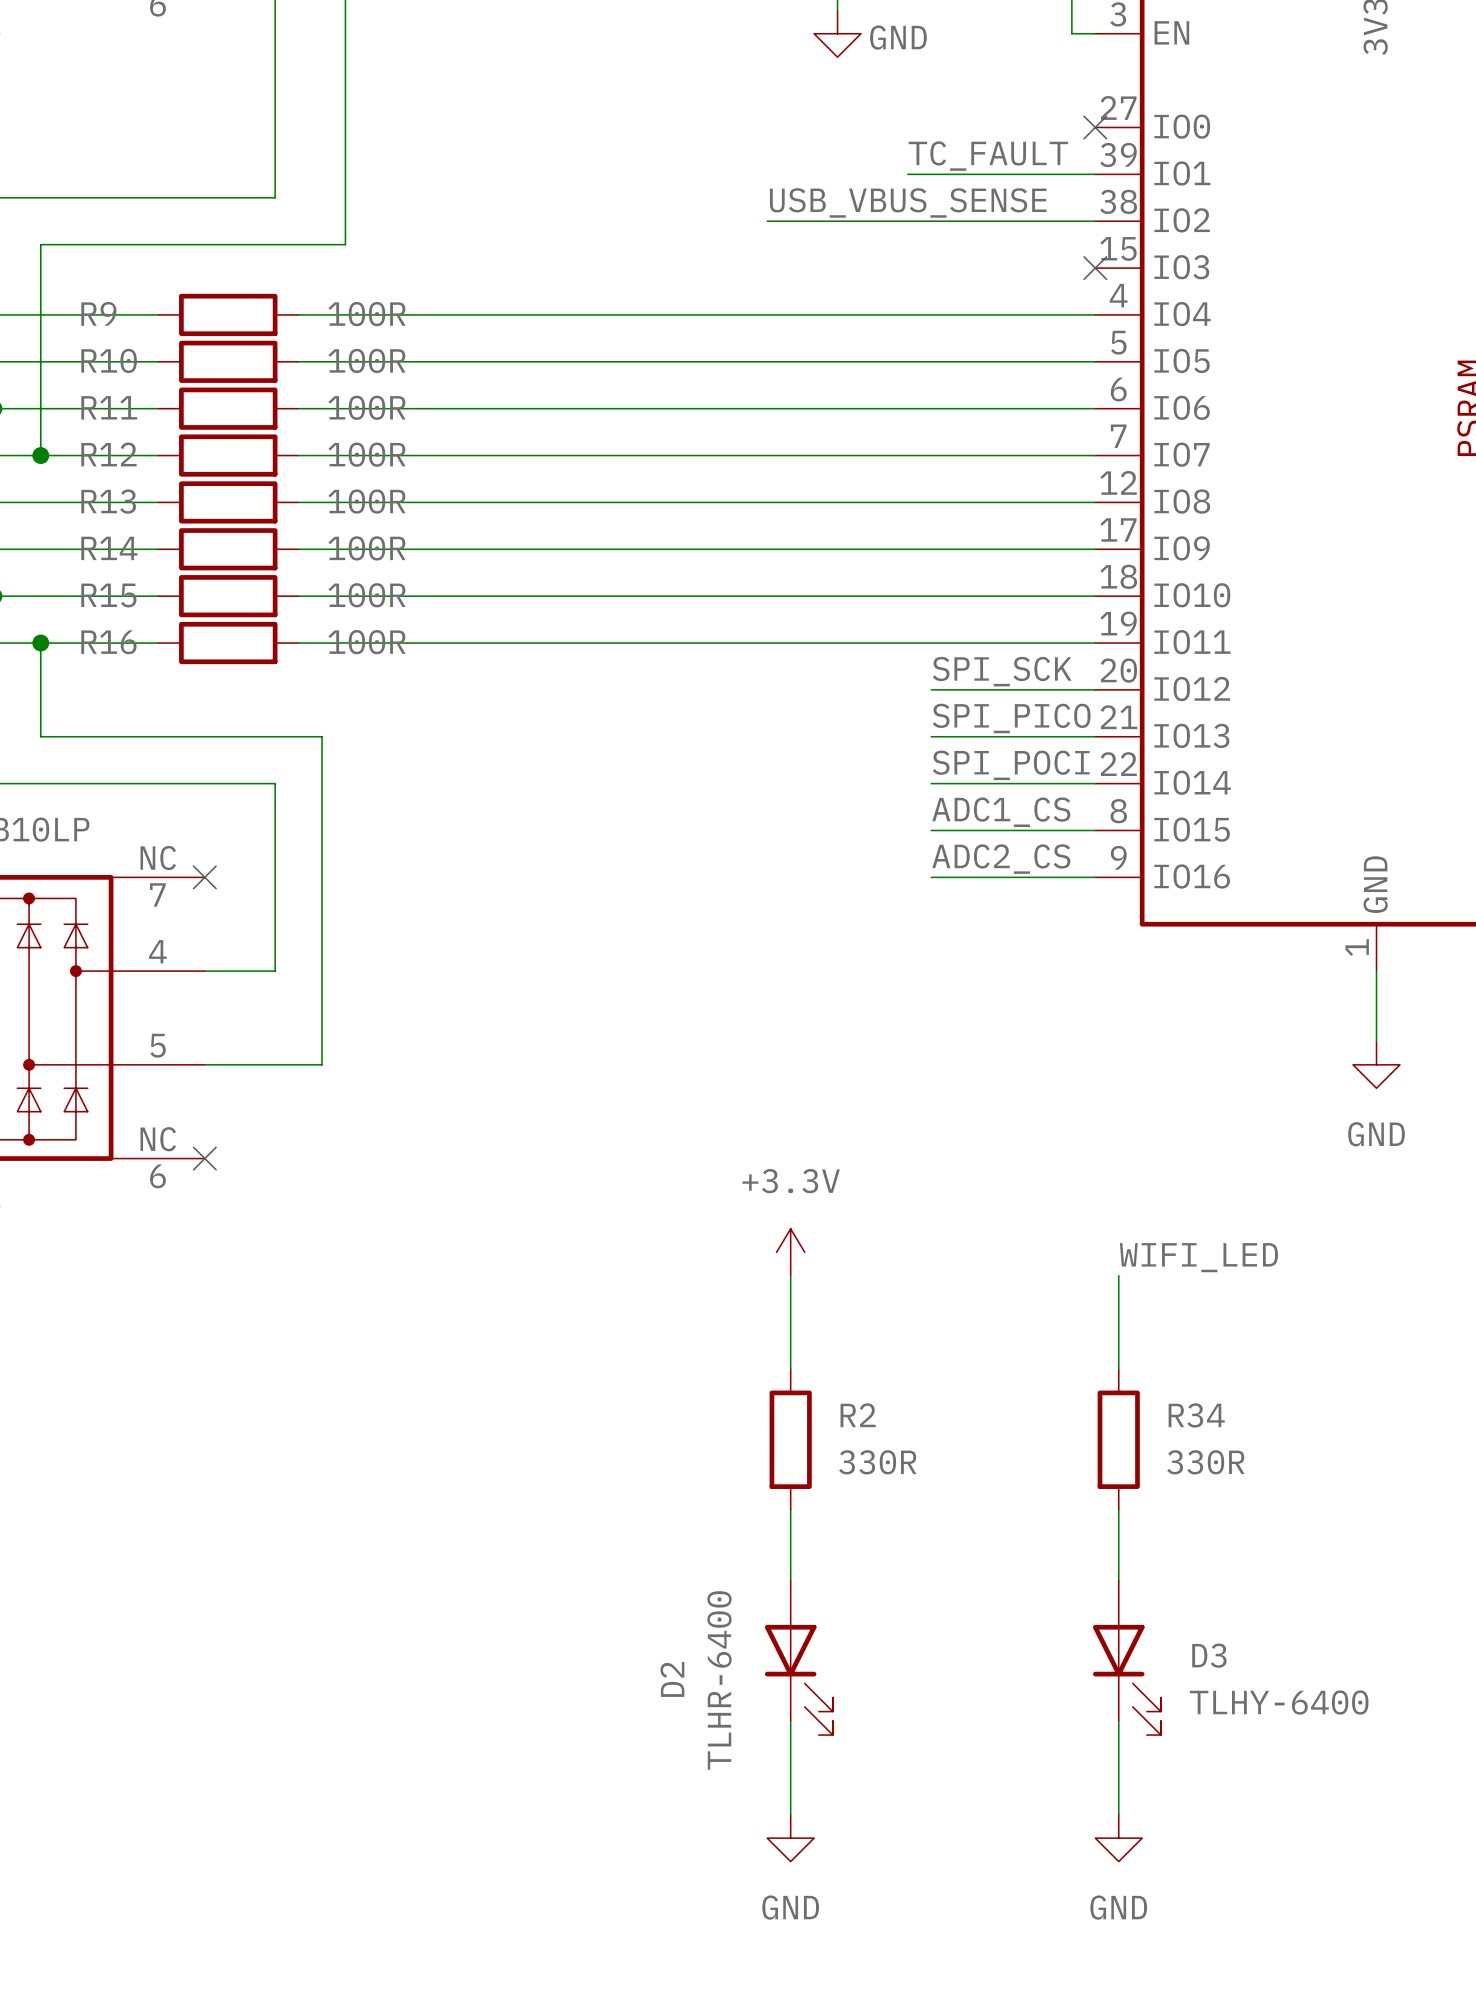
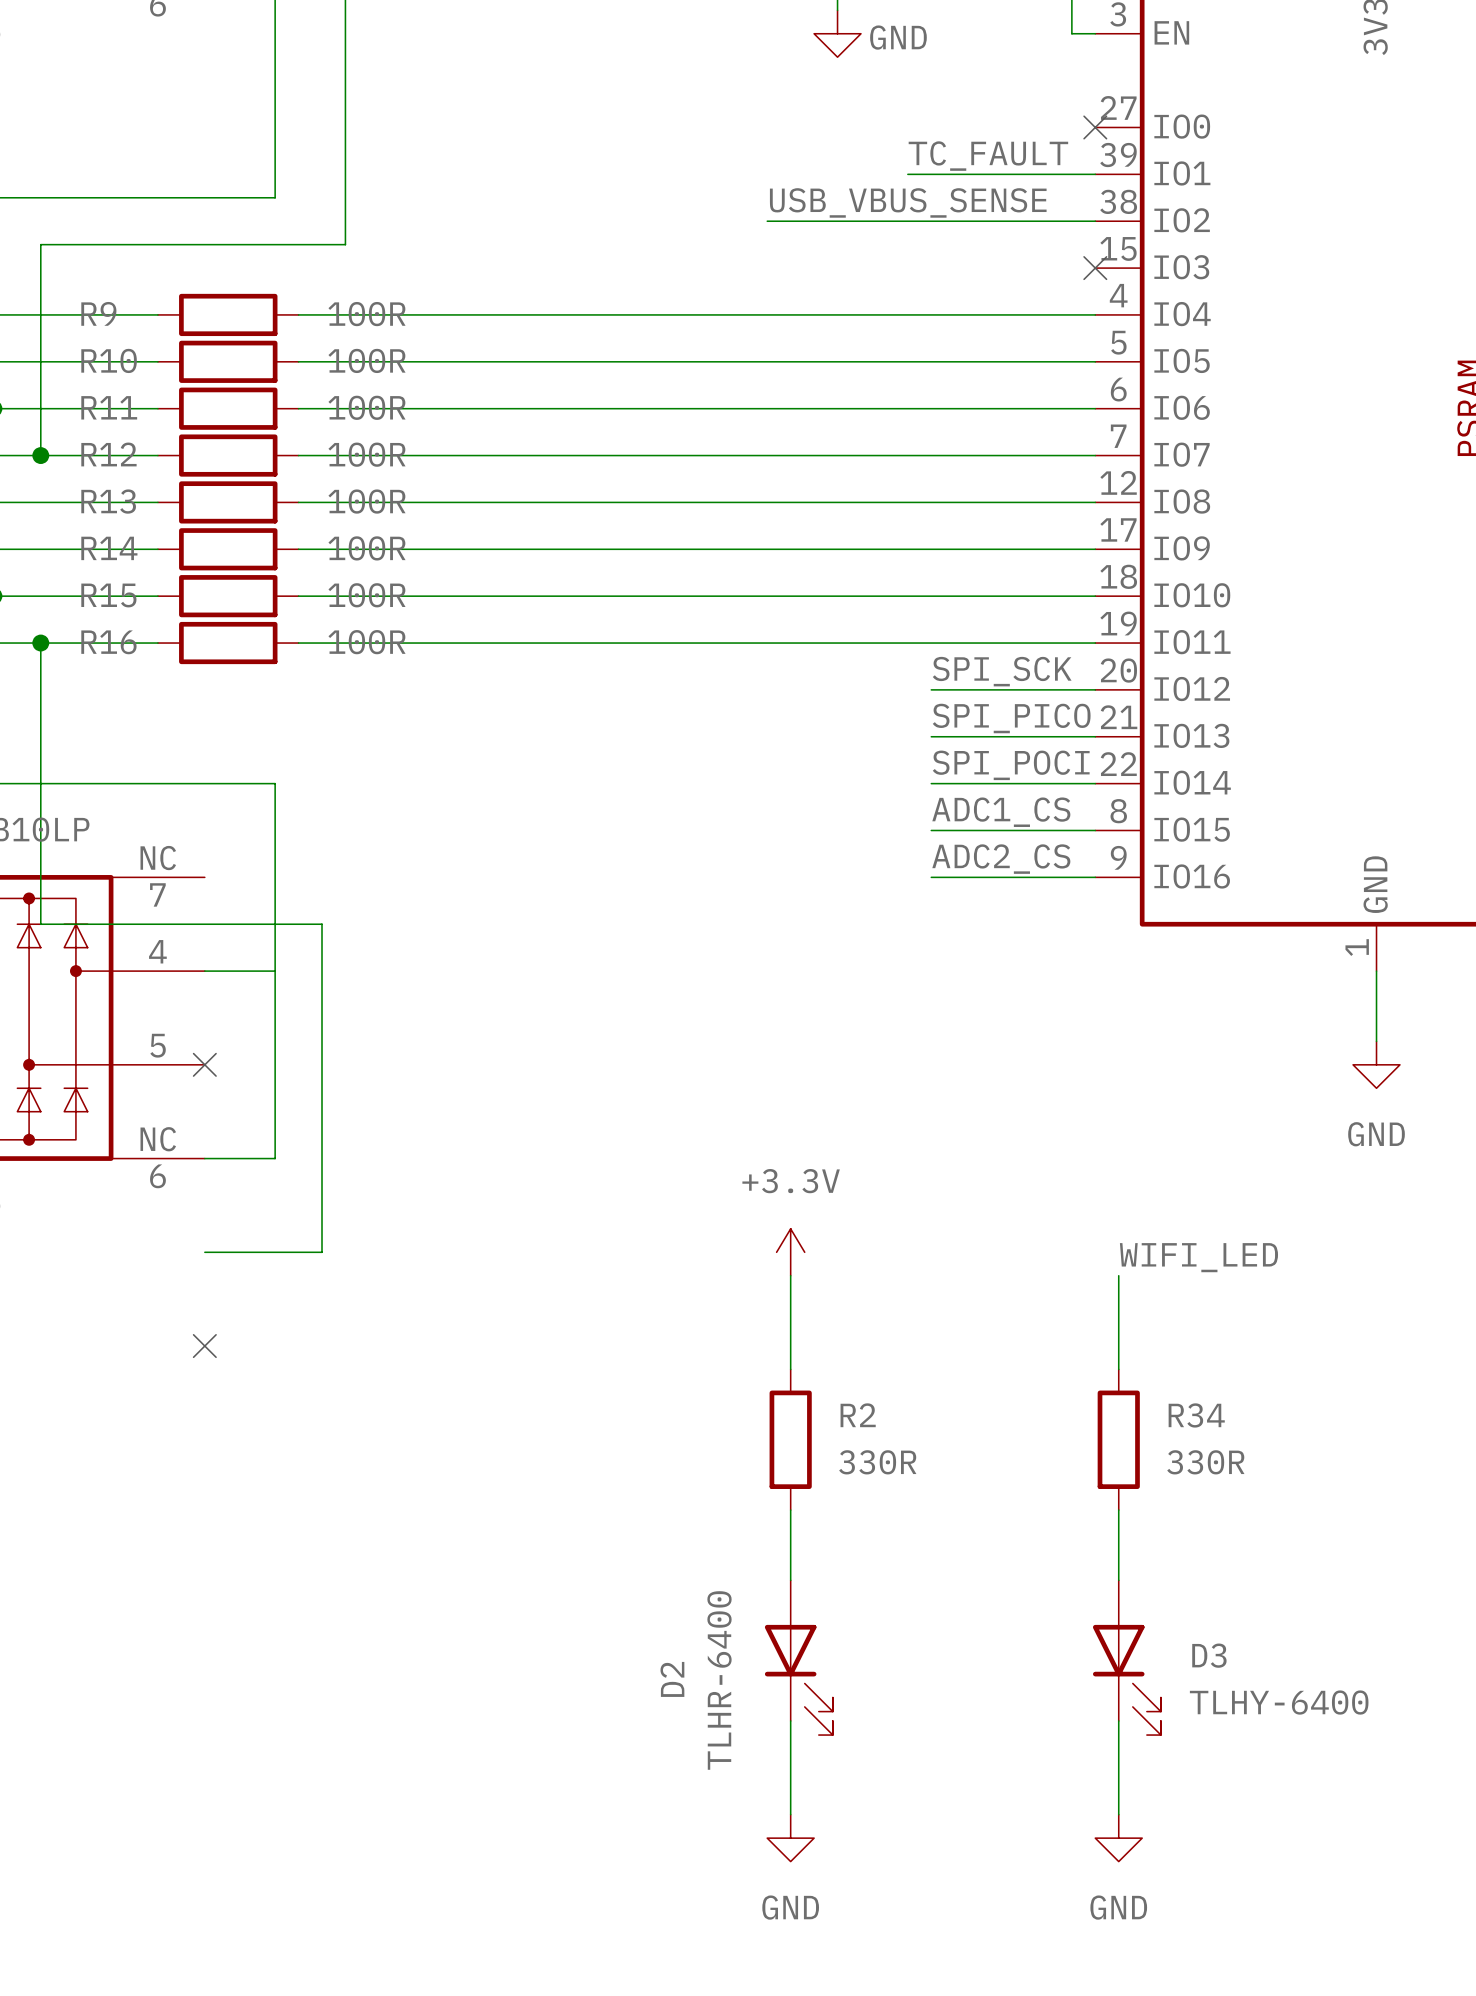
wire: (40, 736) (322, 736) (322, 924) -> (40, 736) (40, 924) (322, 924)
no-connect mark: (204, 877) -> none
wire: none -> (275, 971) (275, 1158) (204, 1158)
wire: (204, 1064) (322, 1064) -> (204, 1252) (322, 1252) (322, 1064)
no-connect mark: none -> (204, 1064)
no-connect mark: (204, 1158) -> none
no-connect mark: none -> (204, 1346)

